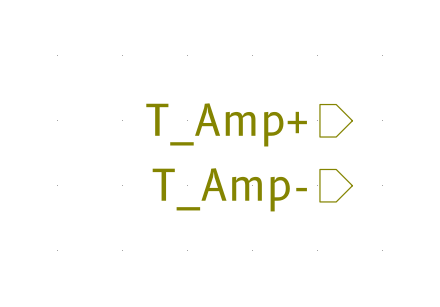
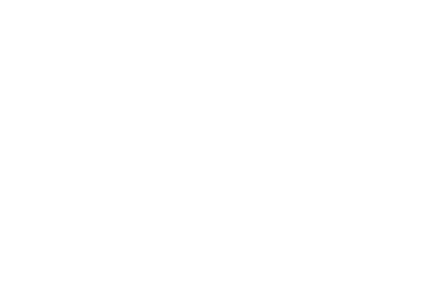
hierarchical label: T_Amp+ (226, 124) -> none
hierarchical label: T_Amp- (229, 189) -> none

